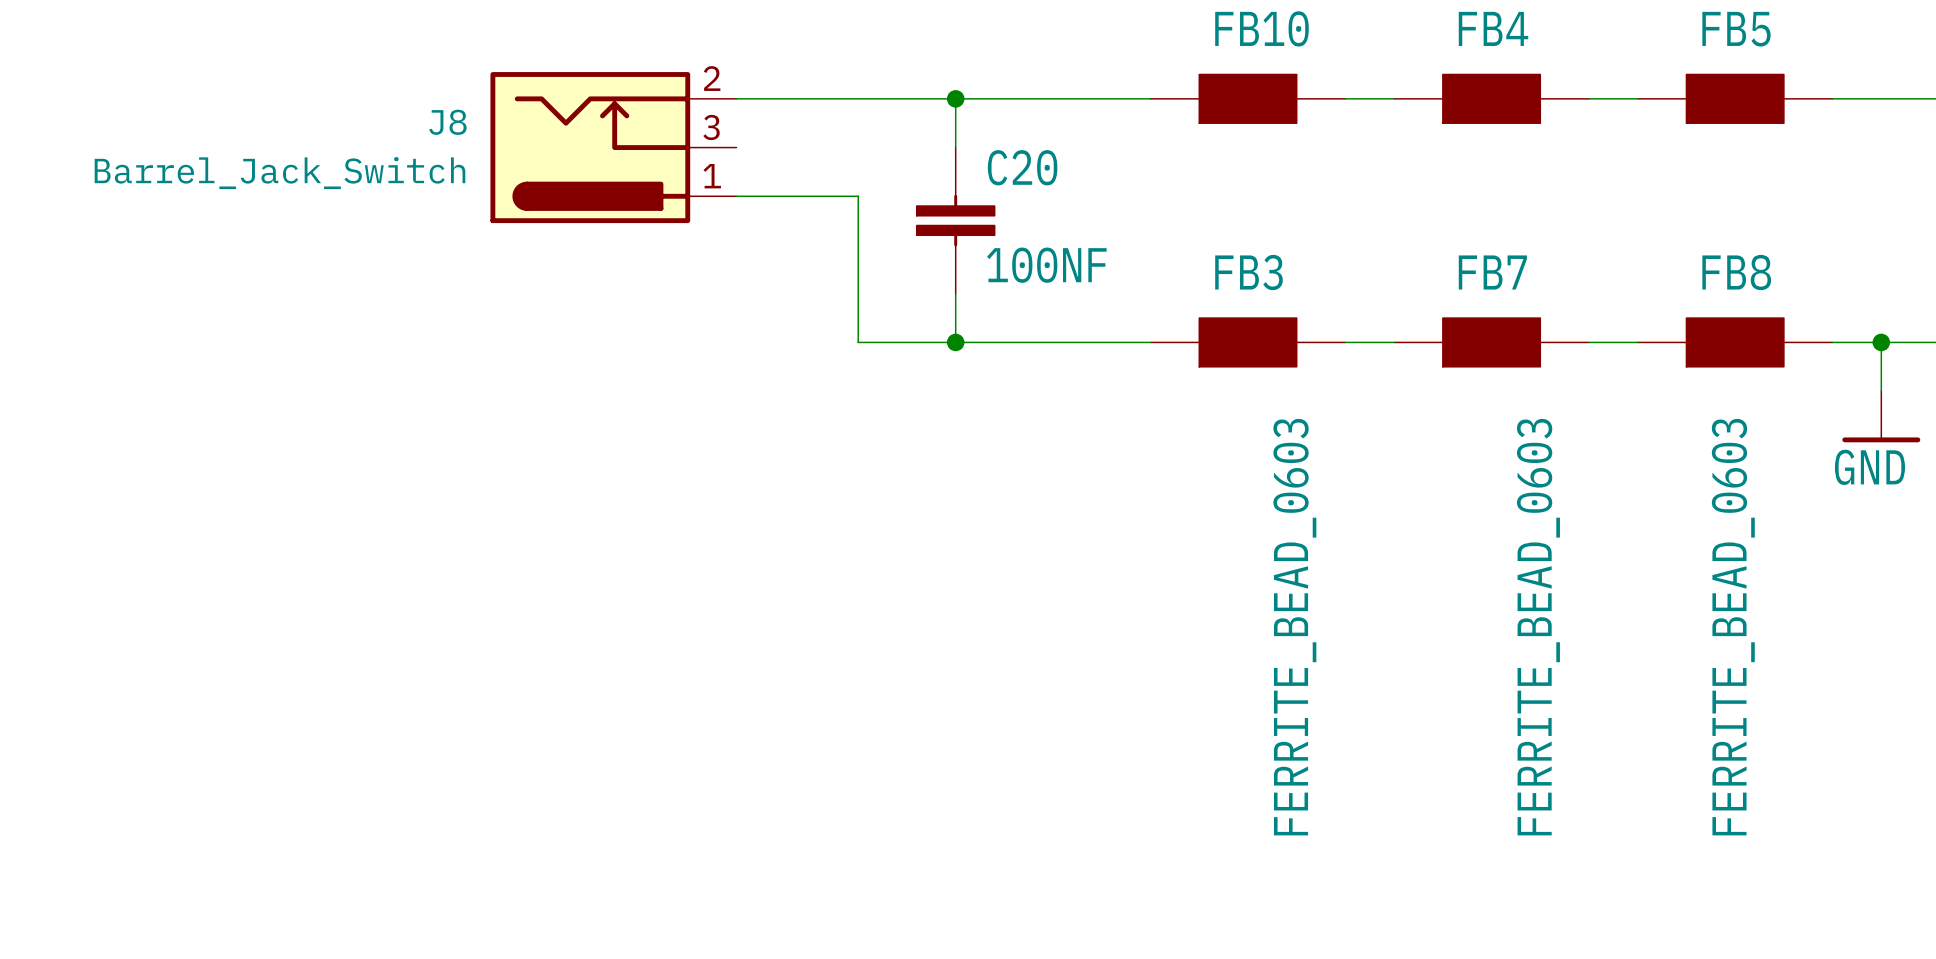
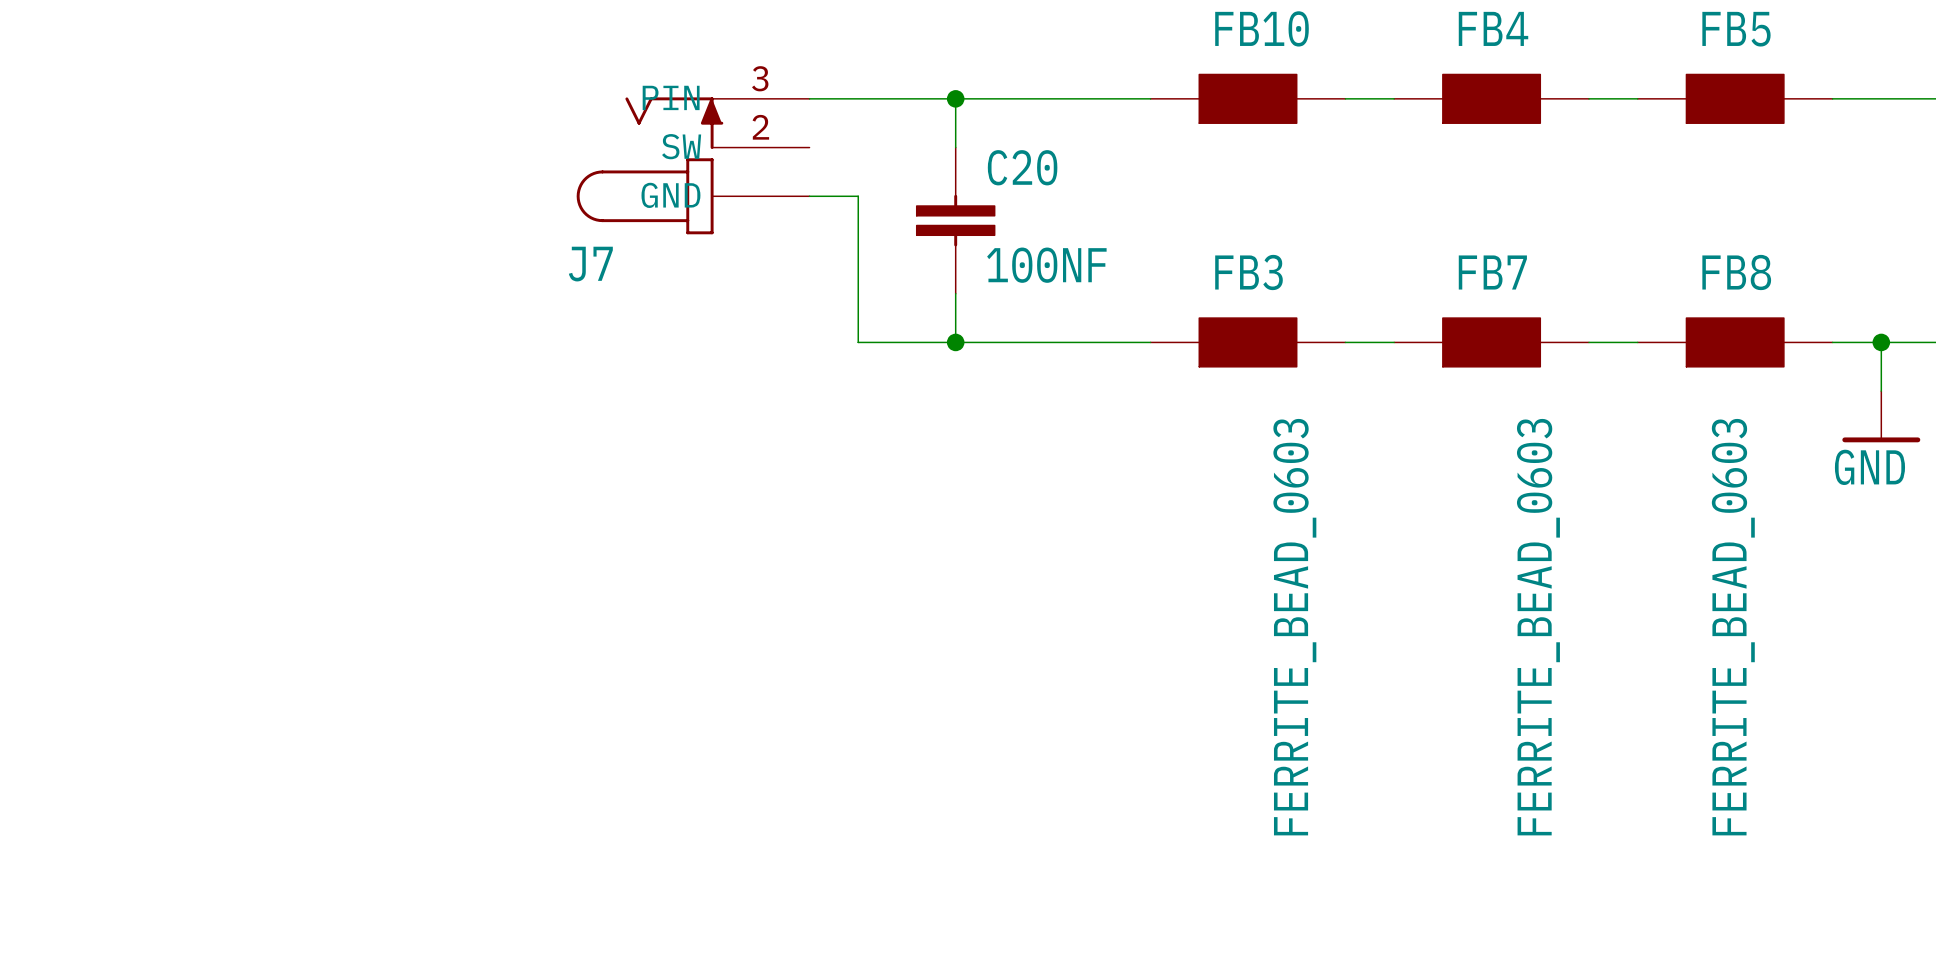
J8: Barrel_Jack_Switch (613, 147) -> none
J7: none -> (693, 165)

